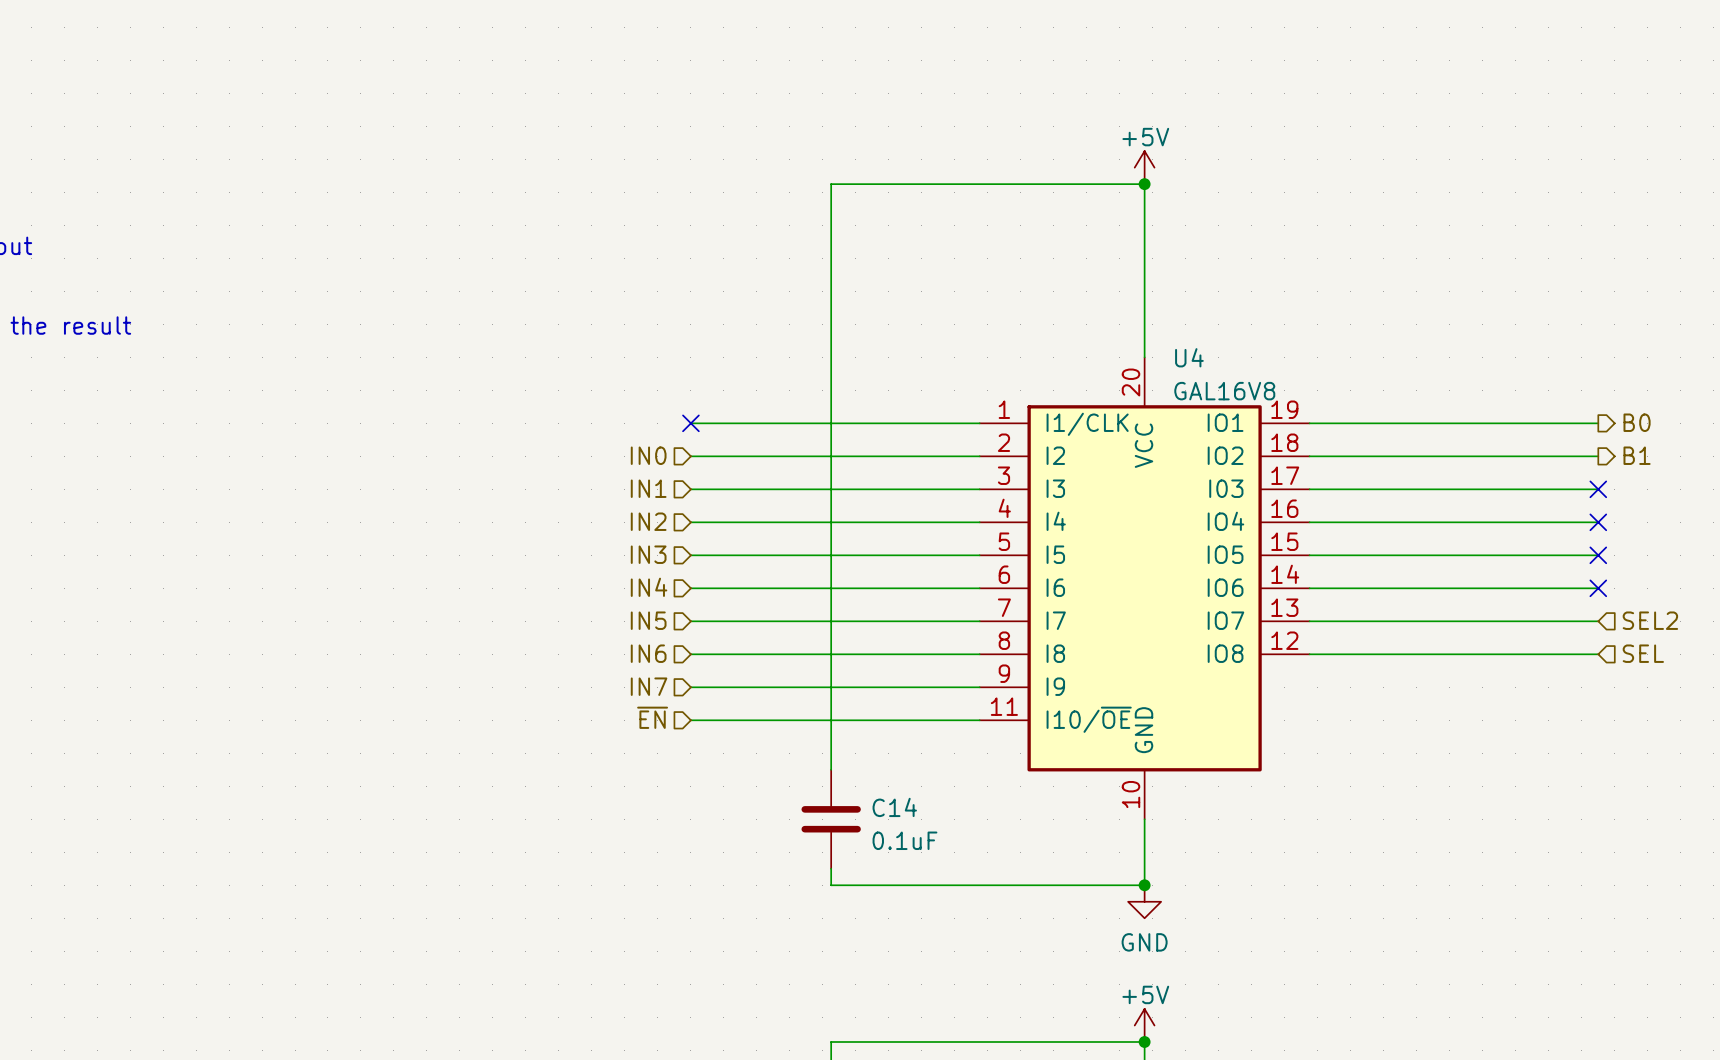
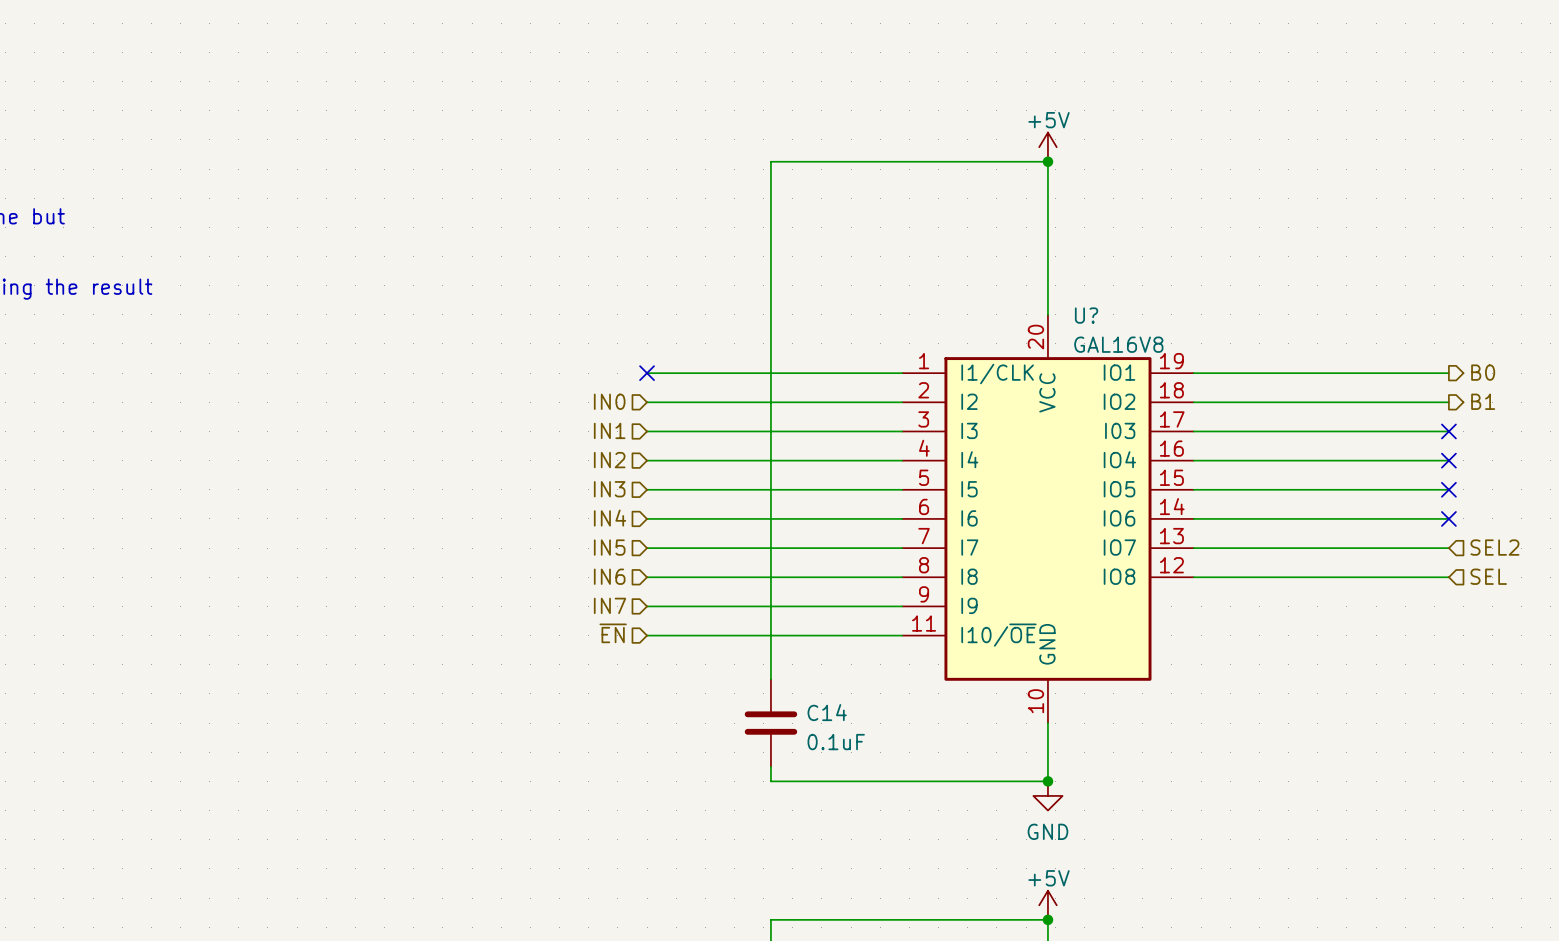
U4 name: U4 (1189, 357) -> U? (1086, 315)

